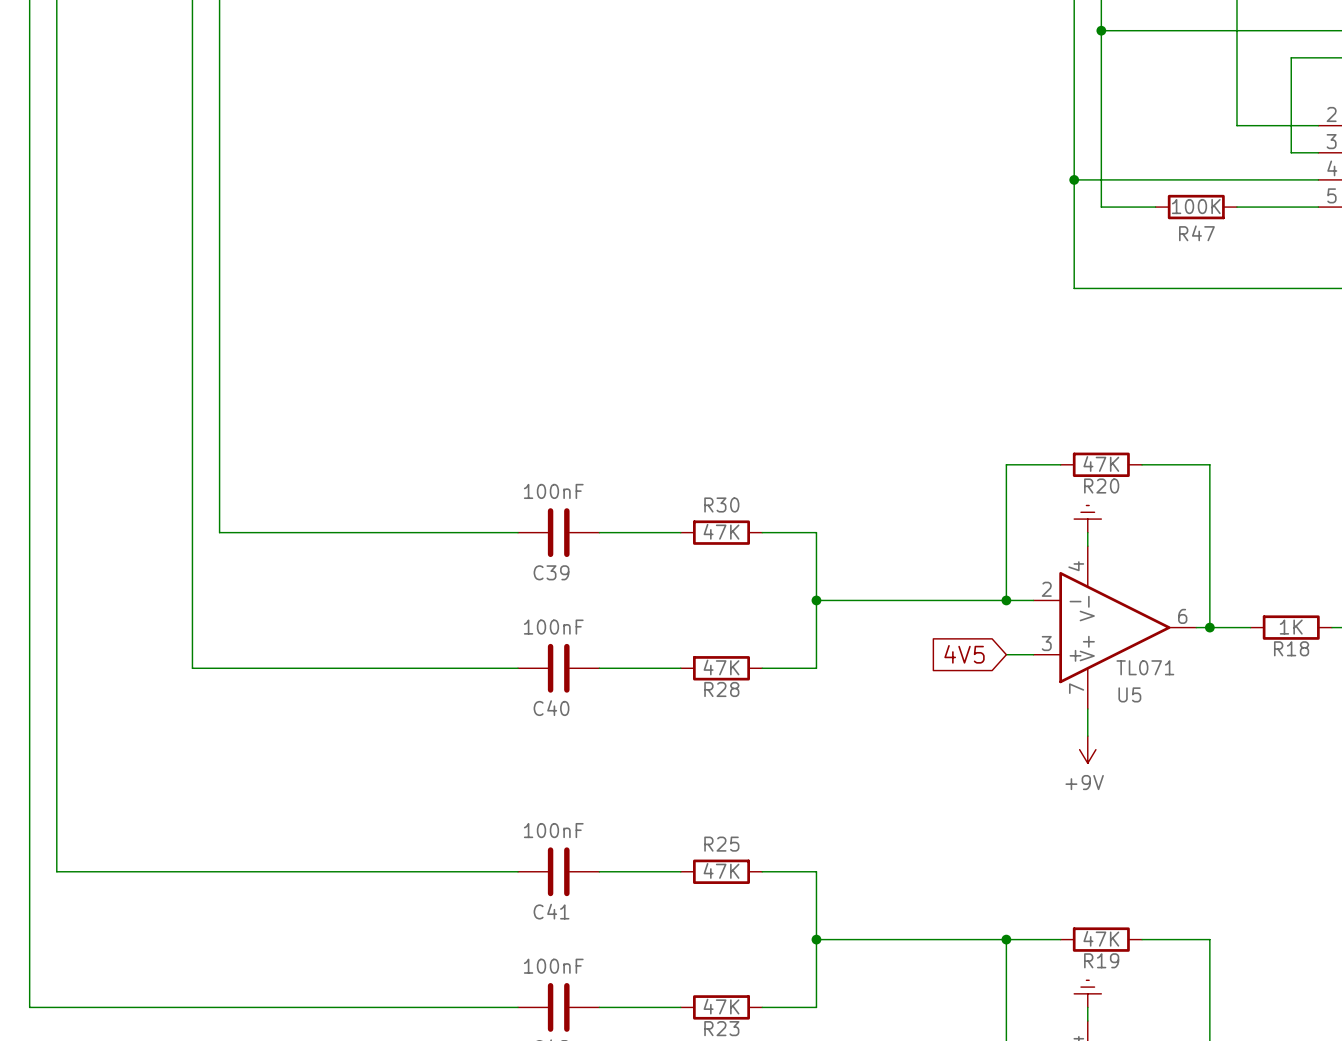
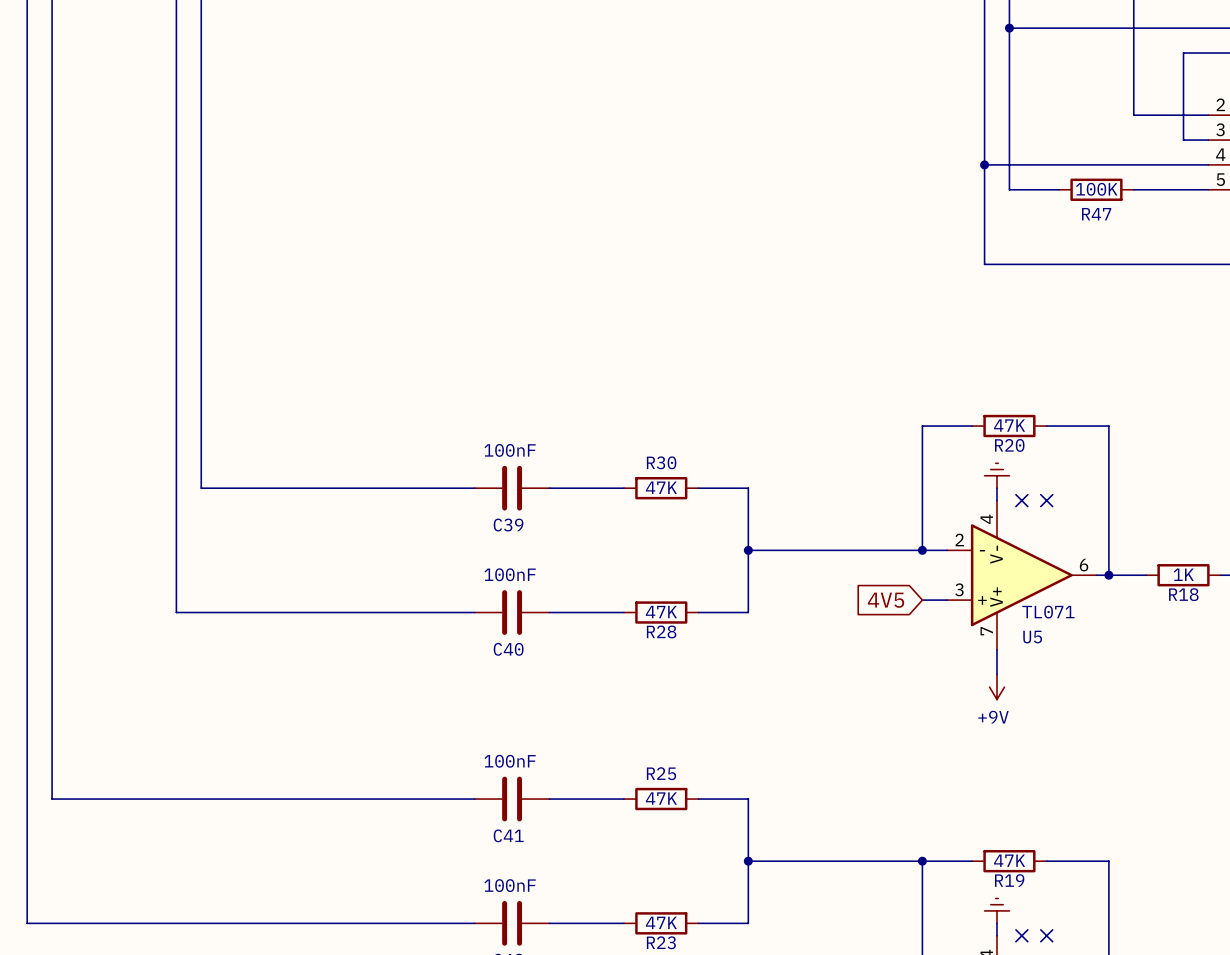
no-connect mark: none -> (1021, 500)
no-connect mark: none -> (1046, 500)
no-connect mark: none -> (1021, 935)
no-connect mark: none -> (1046, 935)

